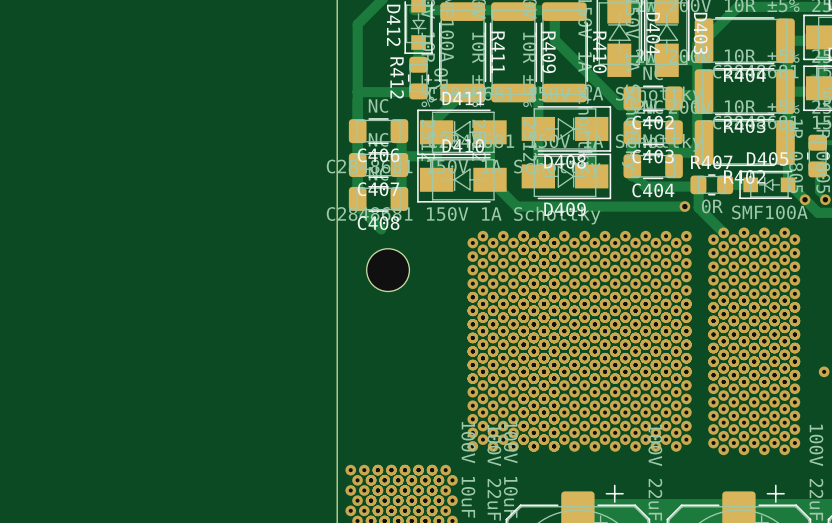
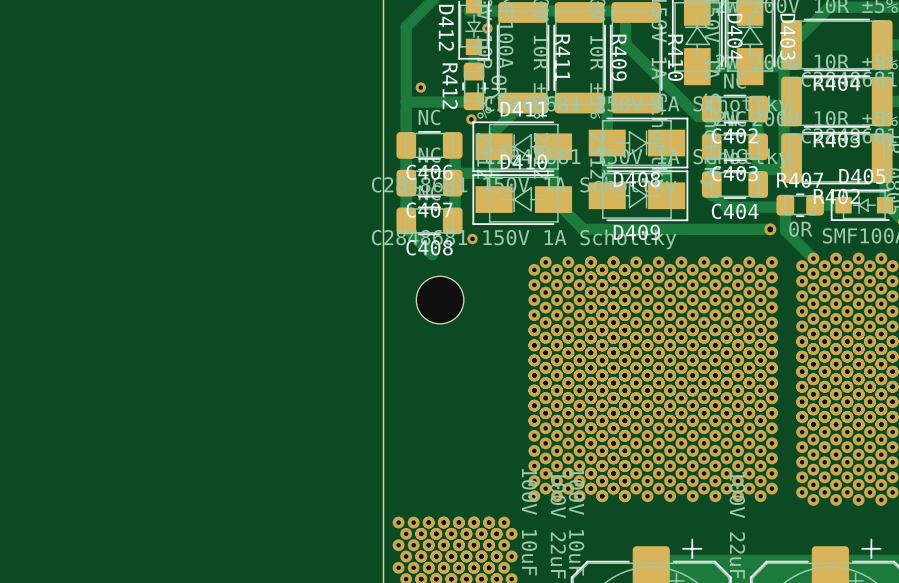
via: none -> (487, 28)
via: none -> (420, 87)
via: none -> (471, 119)
via: none -> (472, 238)

